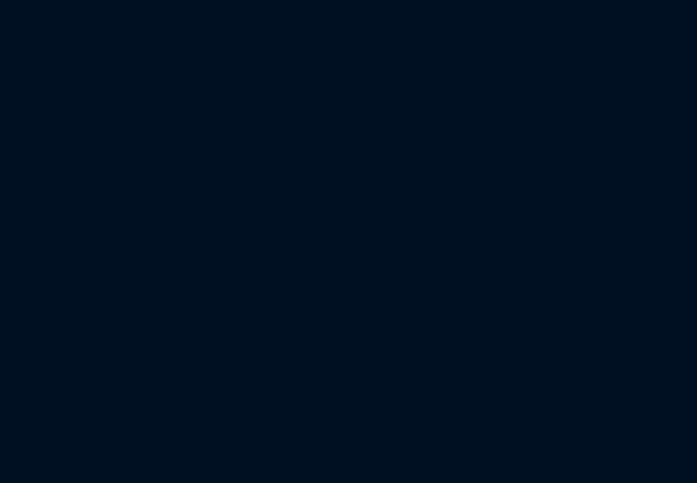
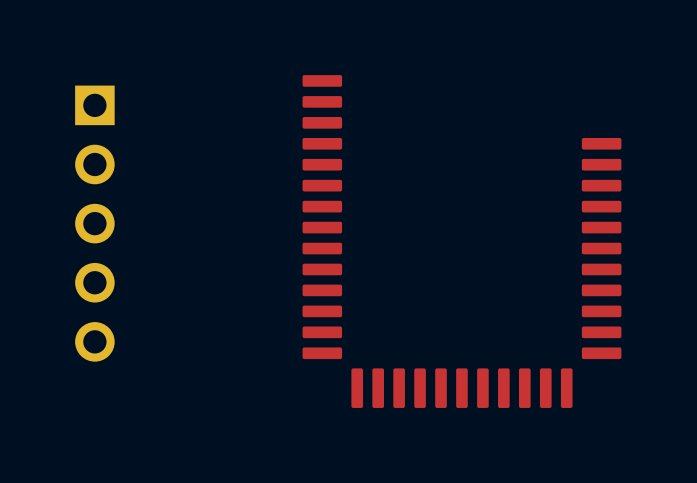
part: none -> (94, 223)
part: none -> (461, 241)

